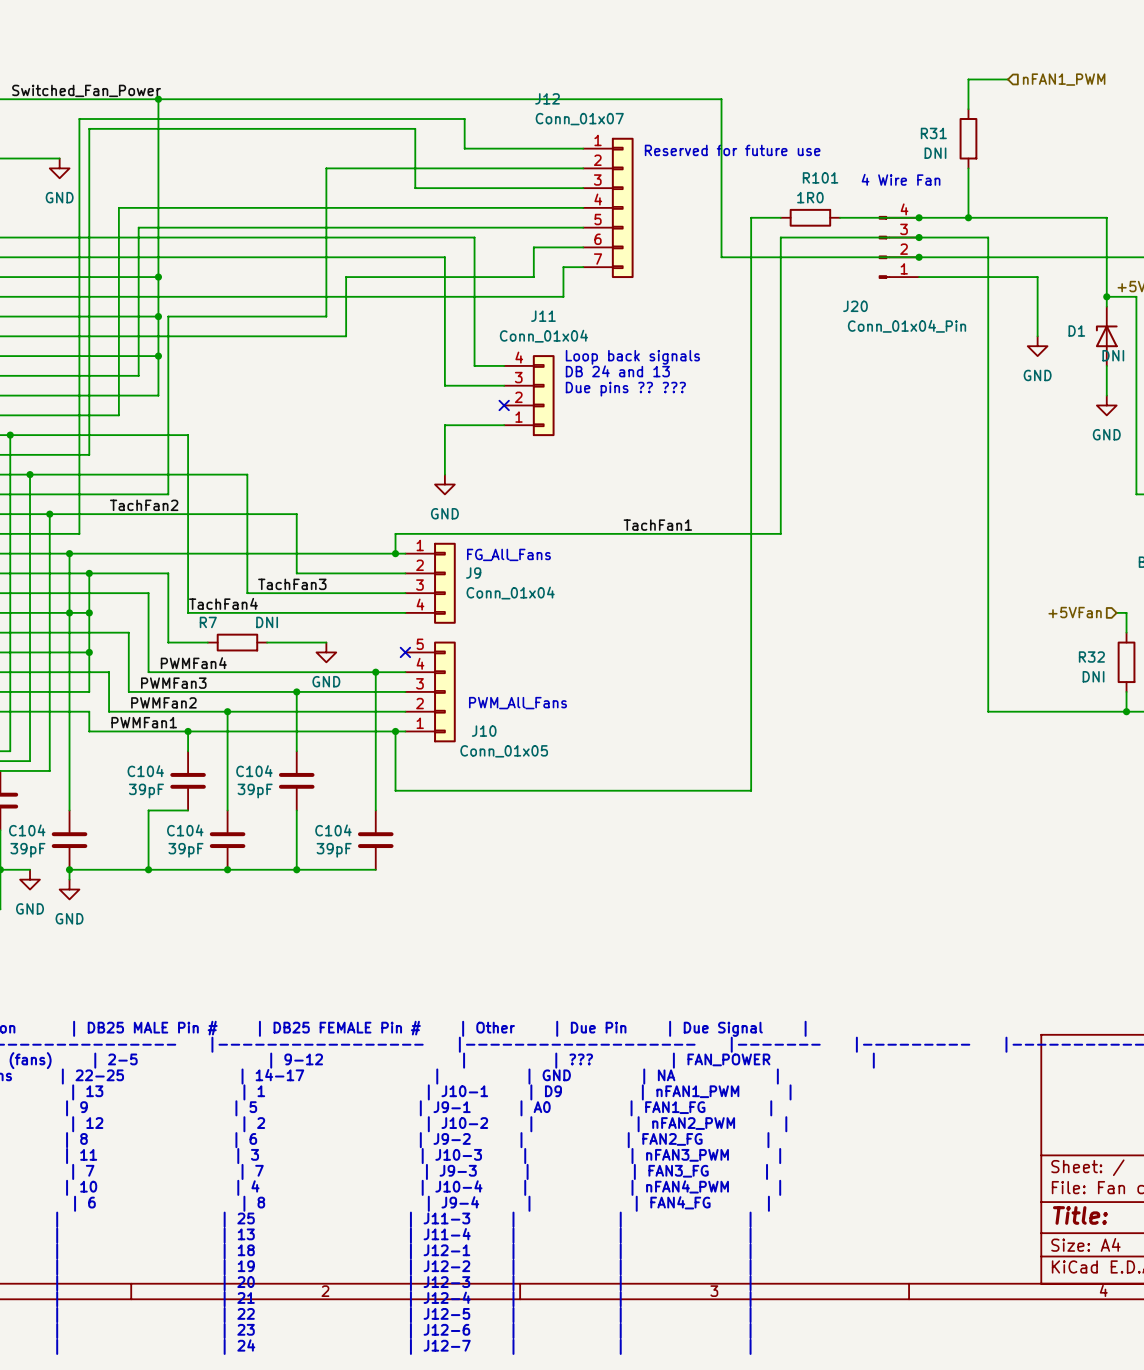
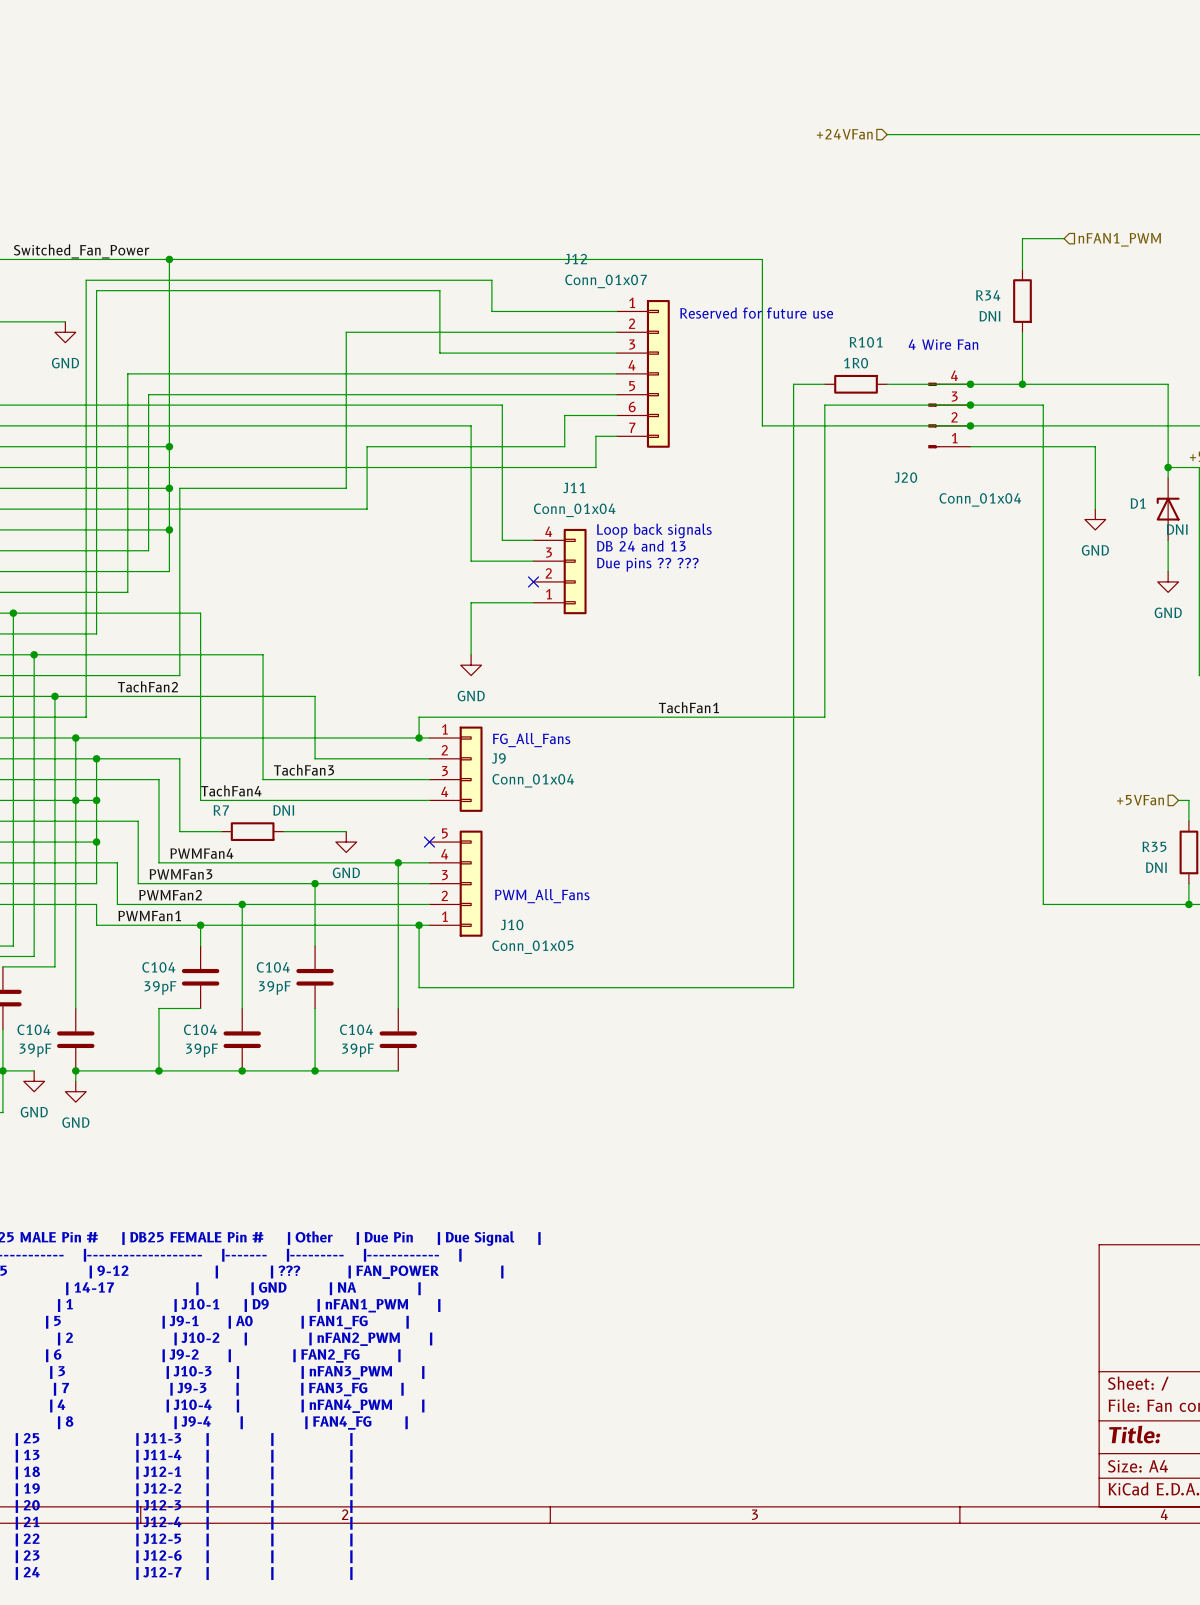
R31 name: R31 (933, 133) -> R34 (988, 295)
J20 value: Conn_01x04_Pin (907, 326) -> Conn_01x04 (980, 499)
R32 name: R32 (1091, 657) -> R35 (1154, 846)

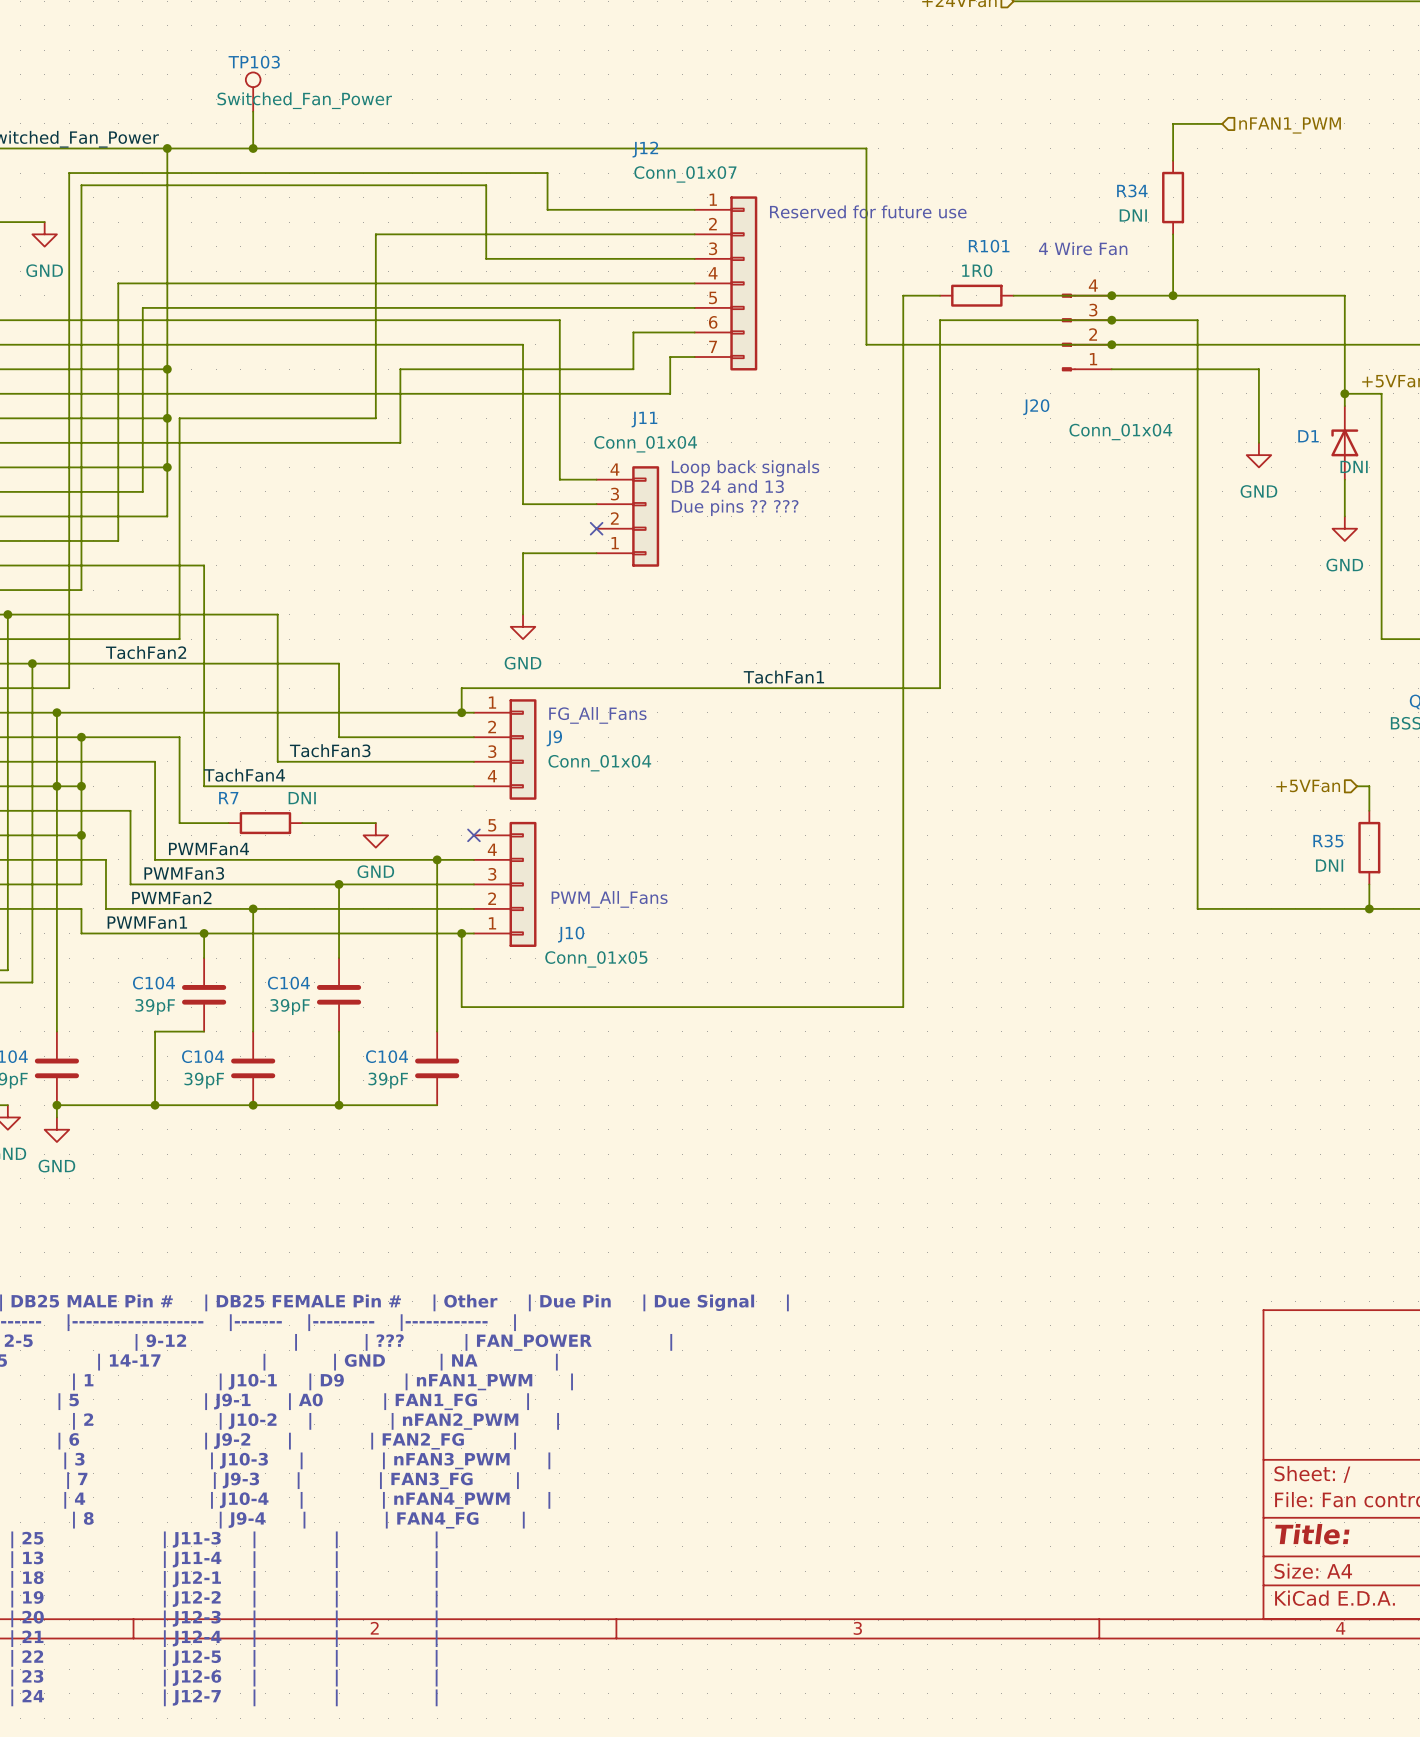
TP103: none -> Switched_Fan_Power (253, 92)
wire: none -> (253, 111) (253, 148)
junction: none -> (253, 148)

